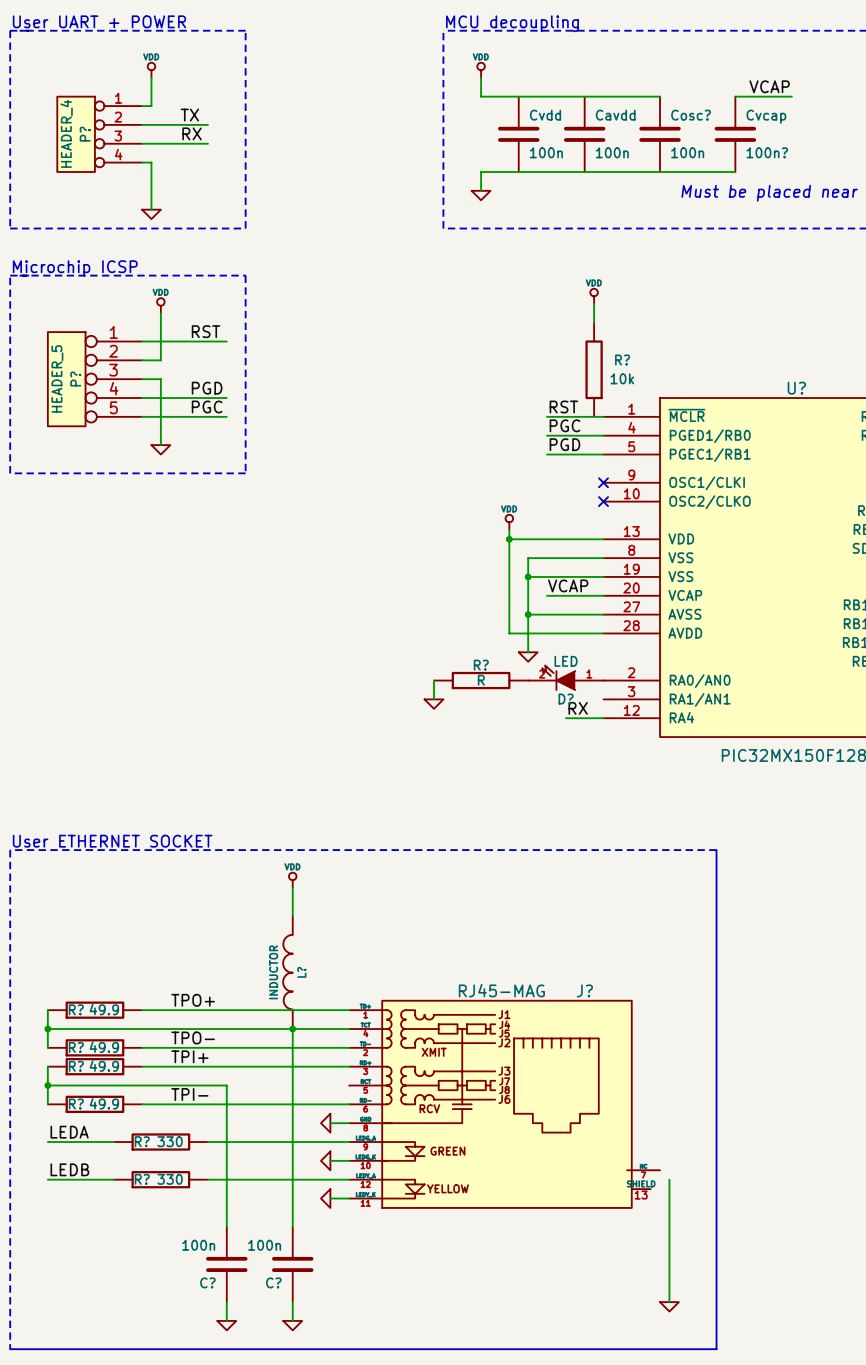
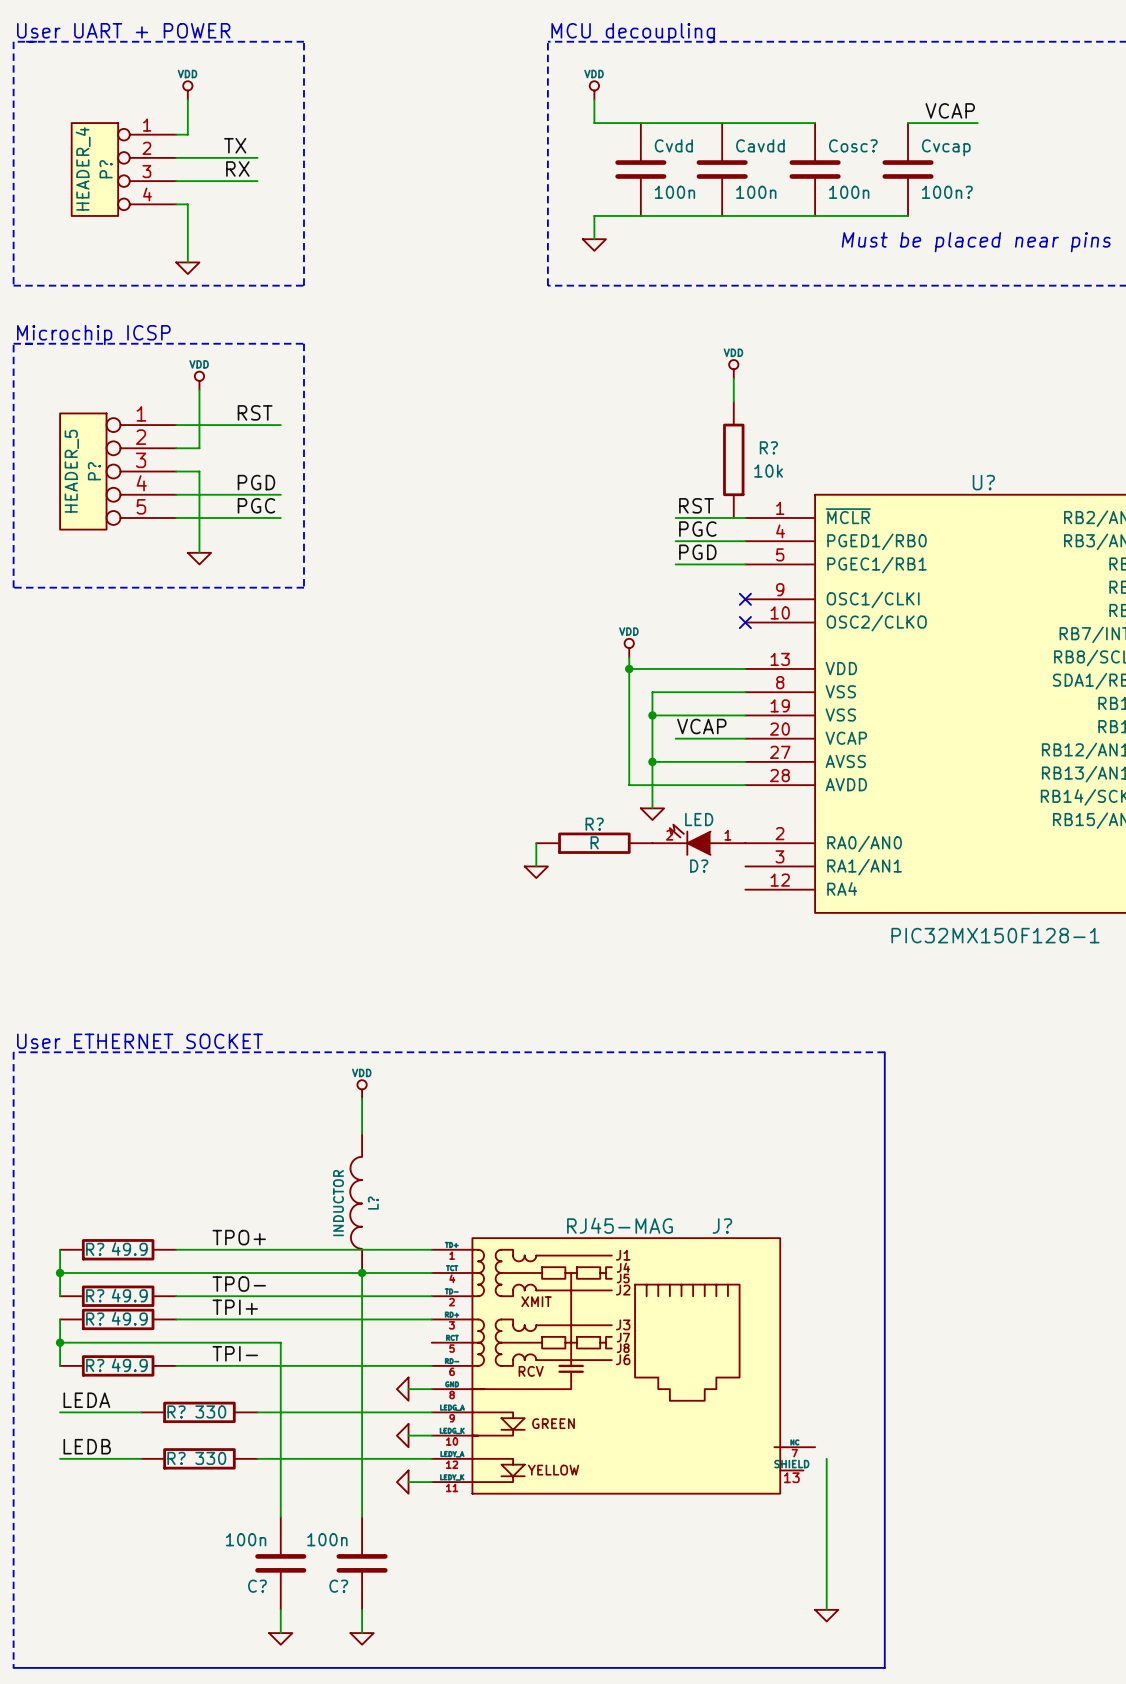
label: RX (578, 708) -> none
wire: (565, 718) (603, 718) -> none

